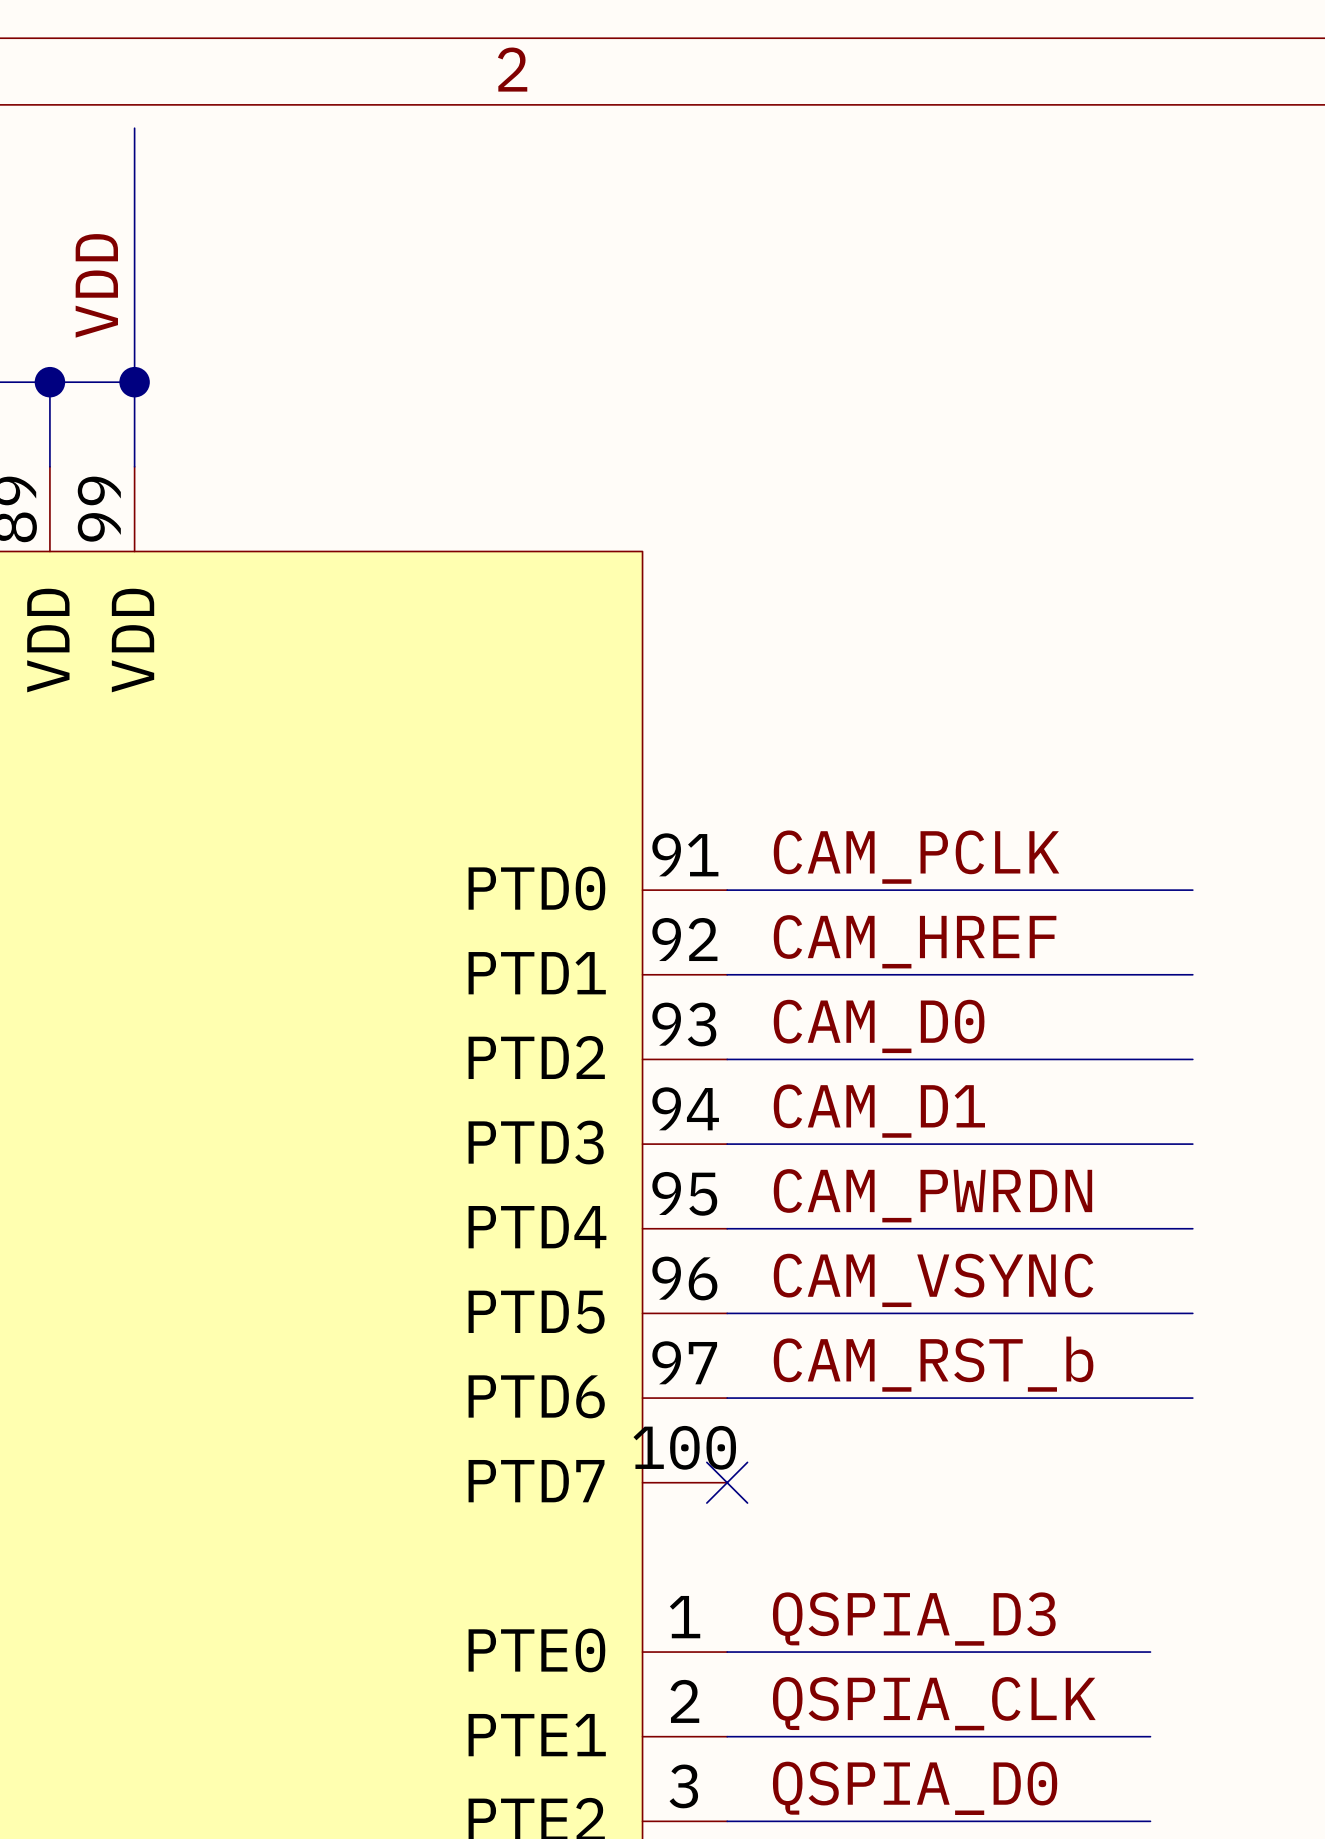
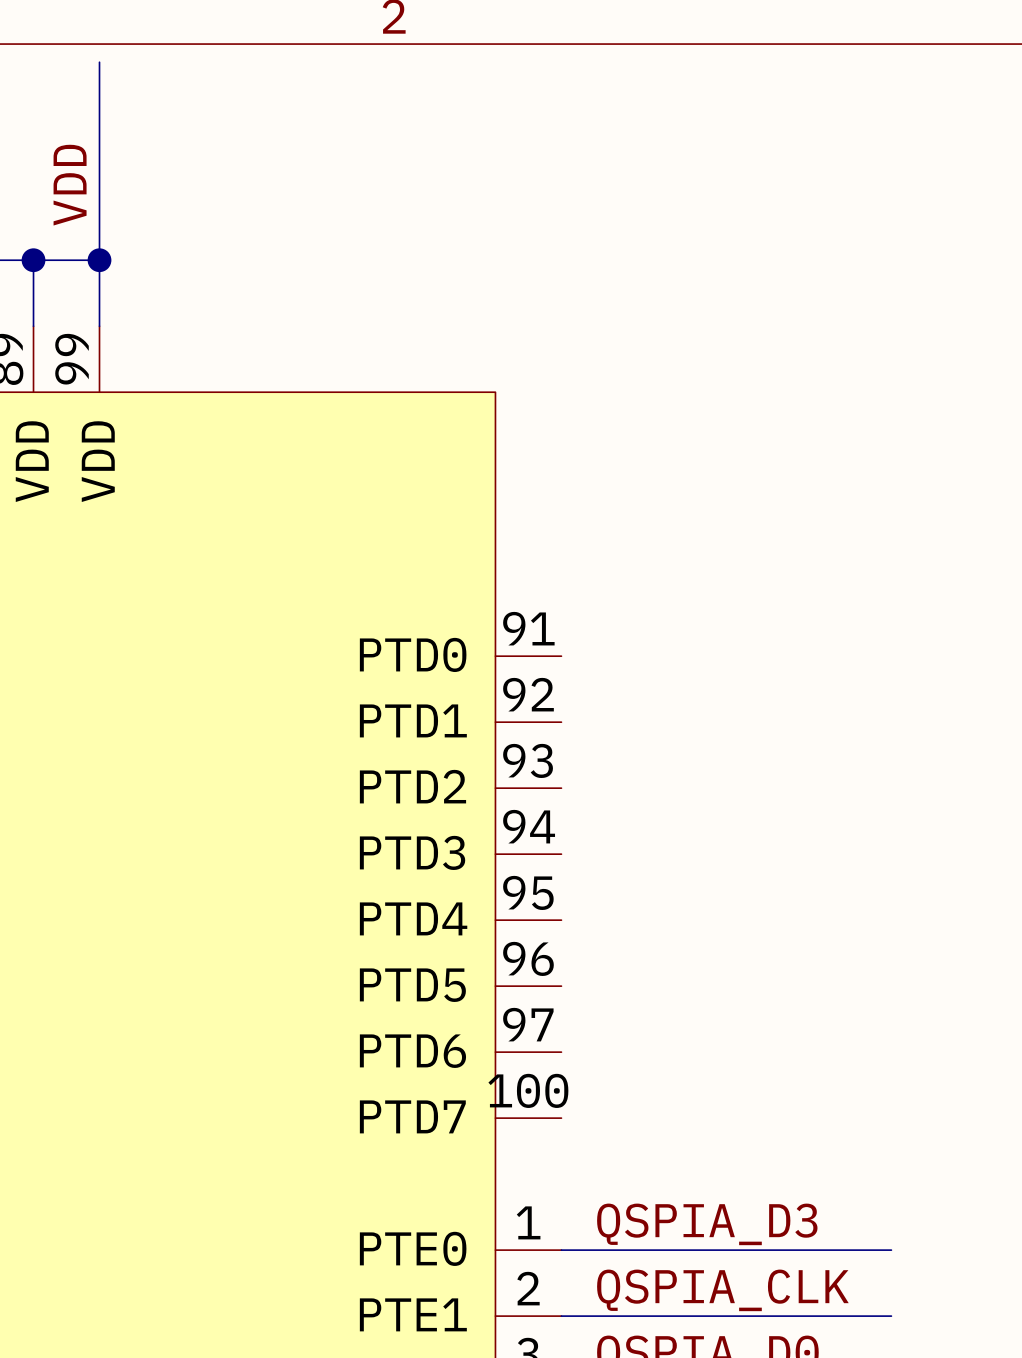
label: CAM_PCLK (916, 857) -> none
wire: (727, 890) (1192, 890) -> none
label: CAM_HREF (915, 941) -> none
wire: (727, 974) (1192, 974) -> none
label: CAM_D0 (879, 1026) -> none
wire: (727, 1059) (1192, 1059) -> none
label: CAM_D1 (879, 1111) -> none
wire: (727, 1144) (1192, 1144) -> none
label: CAM_PWRDN (932, 1195) -> none
wire: (727, 1228) (1192, 1228) -> none
label: CAM_VSYNC (933, 1280) -> none
wire: (727, 1313) (1192, 1313) -> none
label: CAM_RST_b (933, 1364) -> none
wire: (727, 1398) (1192, 1398) -> none
no-connect mark: (727, 1482) -> none

